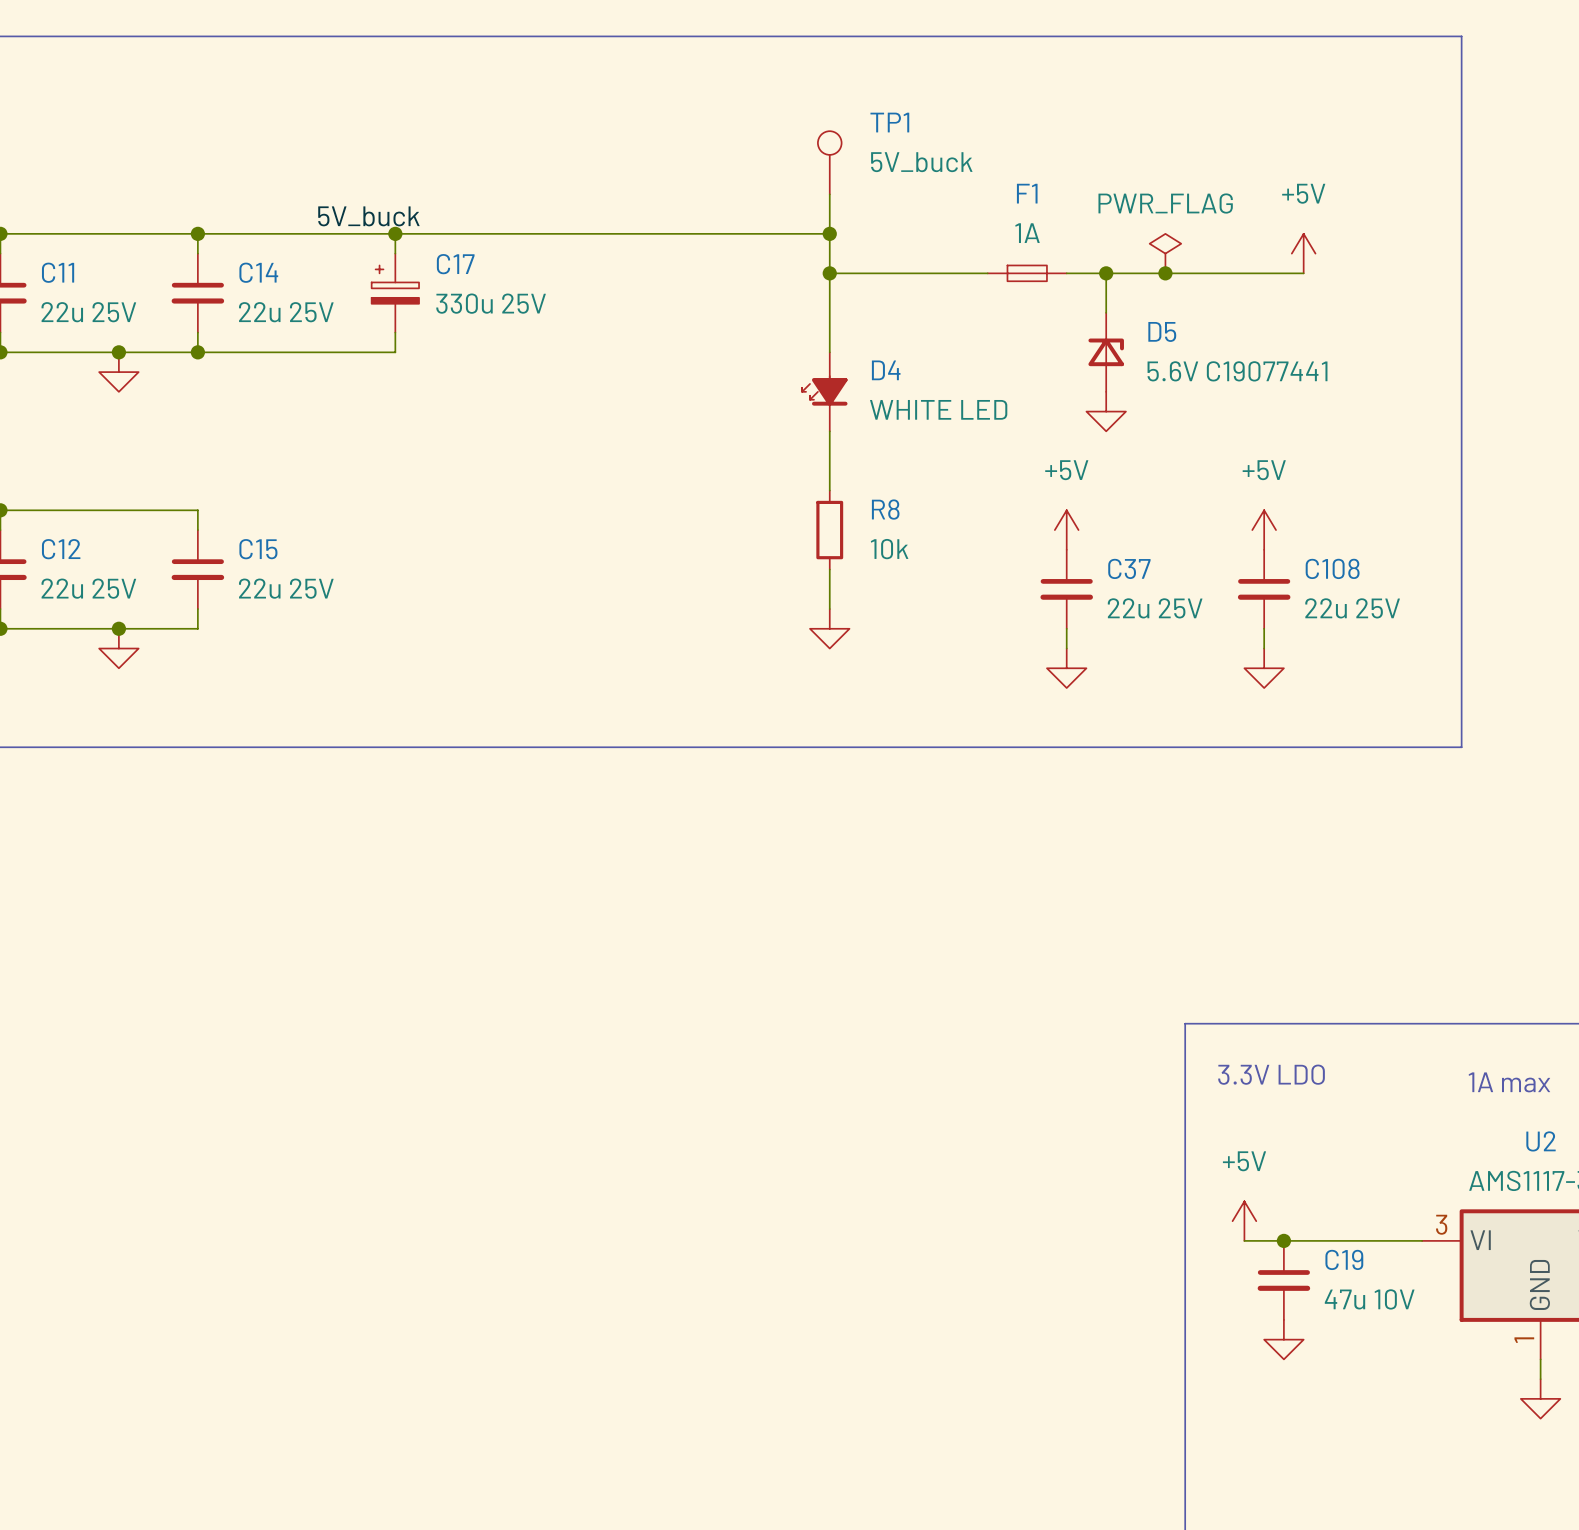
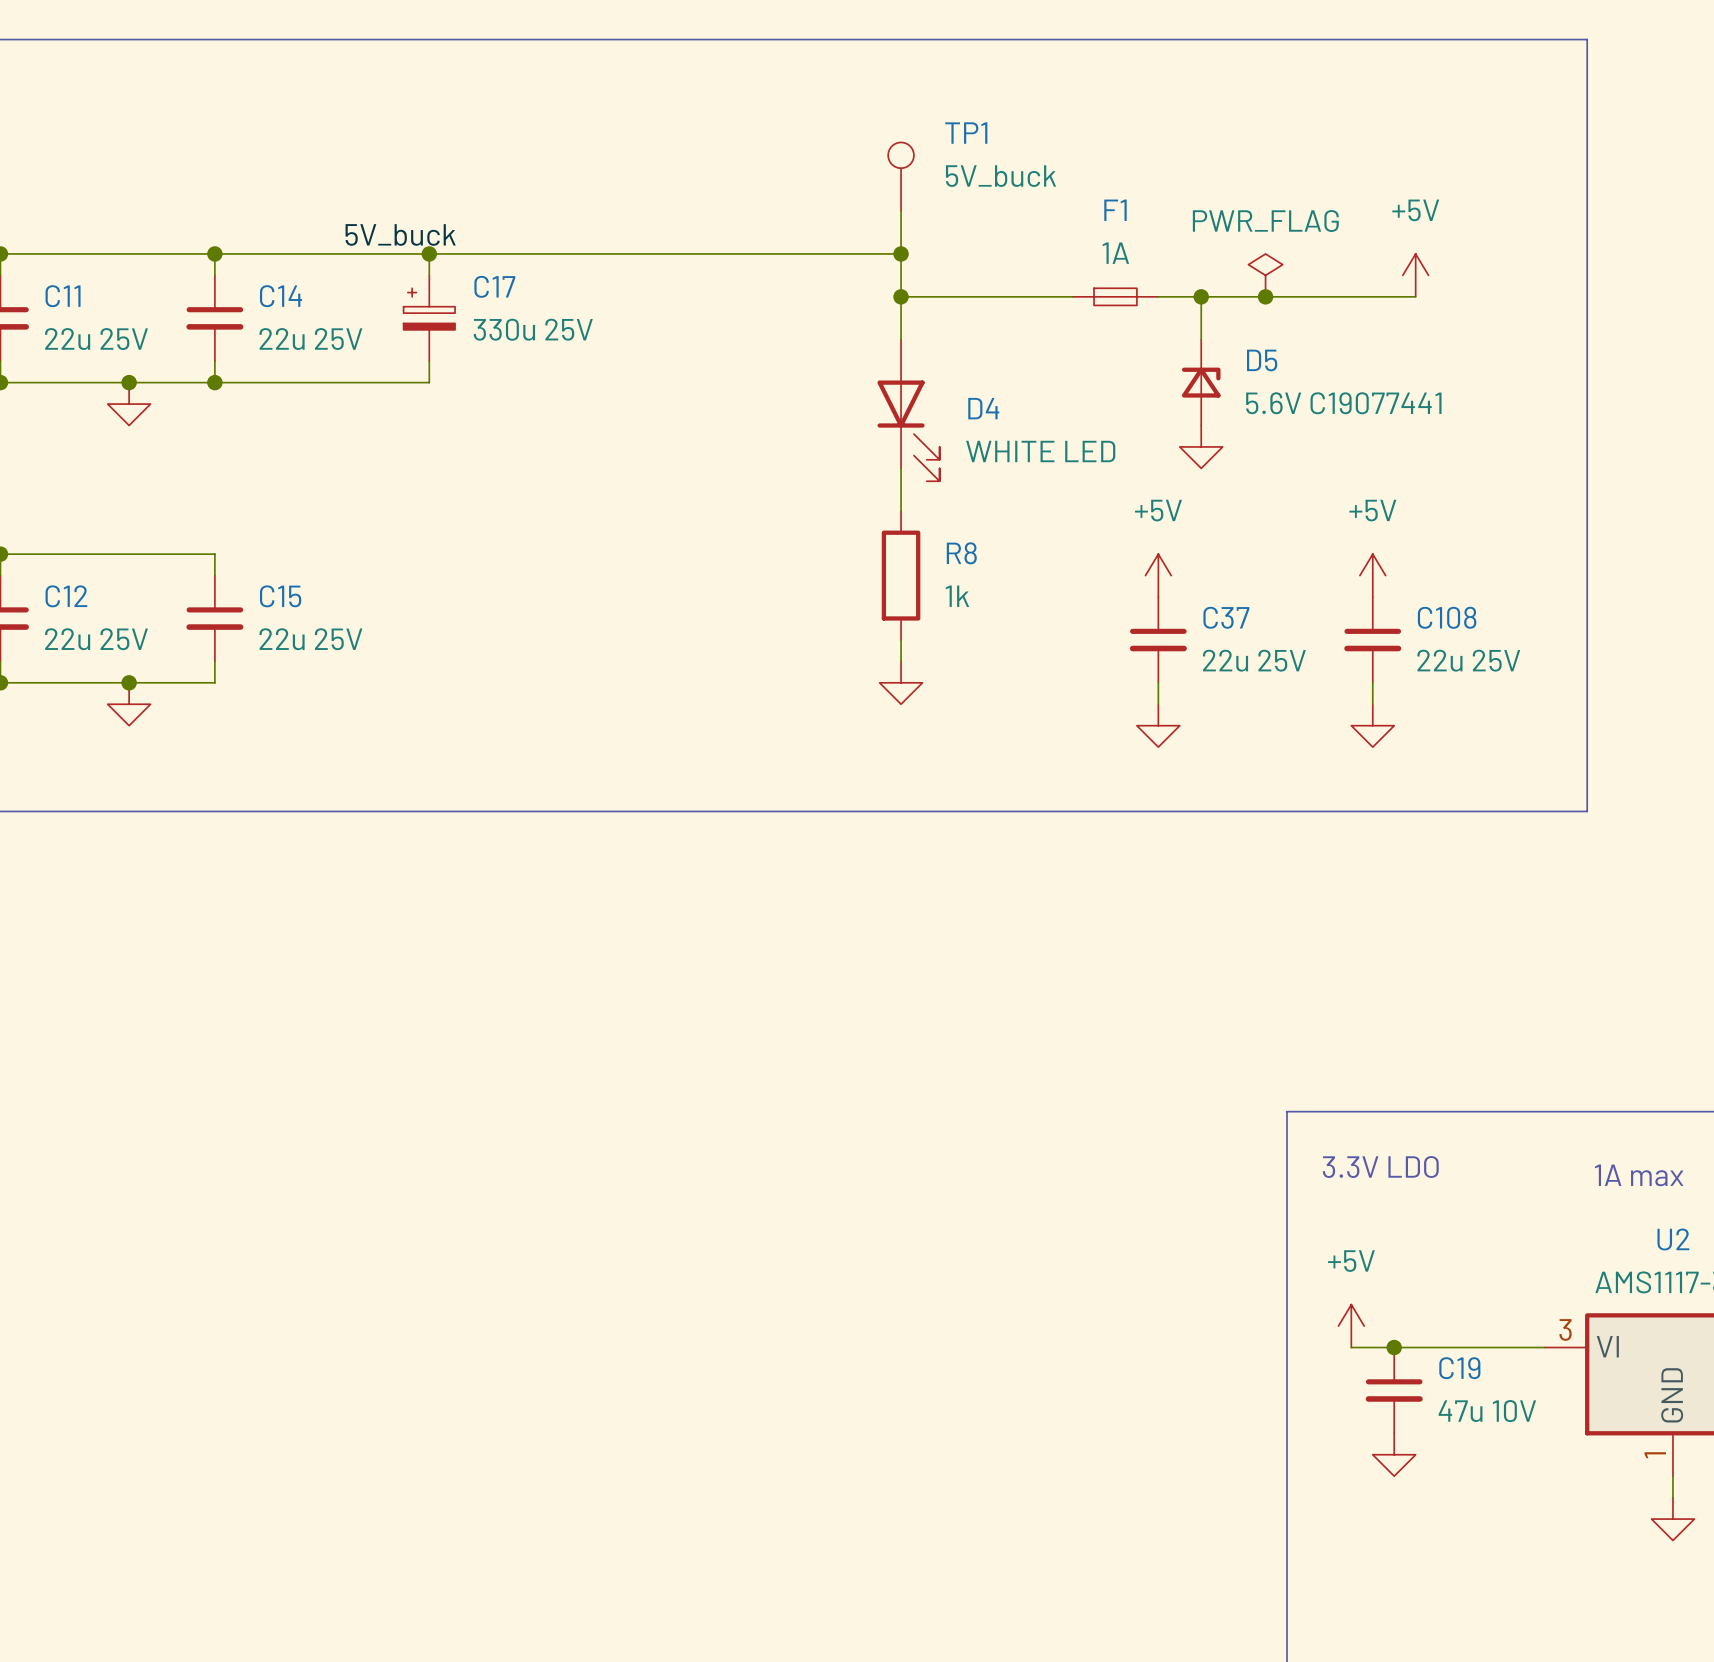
D4 symbol: [802, 352, 848, 432] -> [877, 339, 940, 482]
R8 symbol: [816, 490, 844, 570] -> [881, 511, 921, 640]
R8 value: 10k (889, 549) -> 1k (957, 596)

